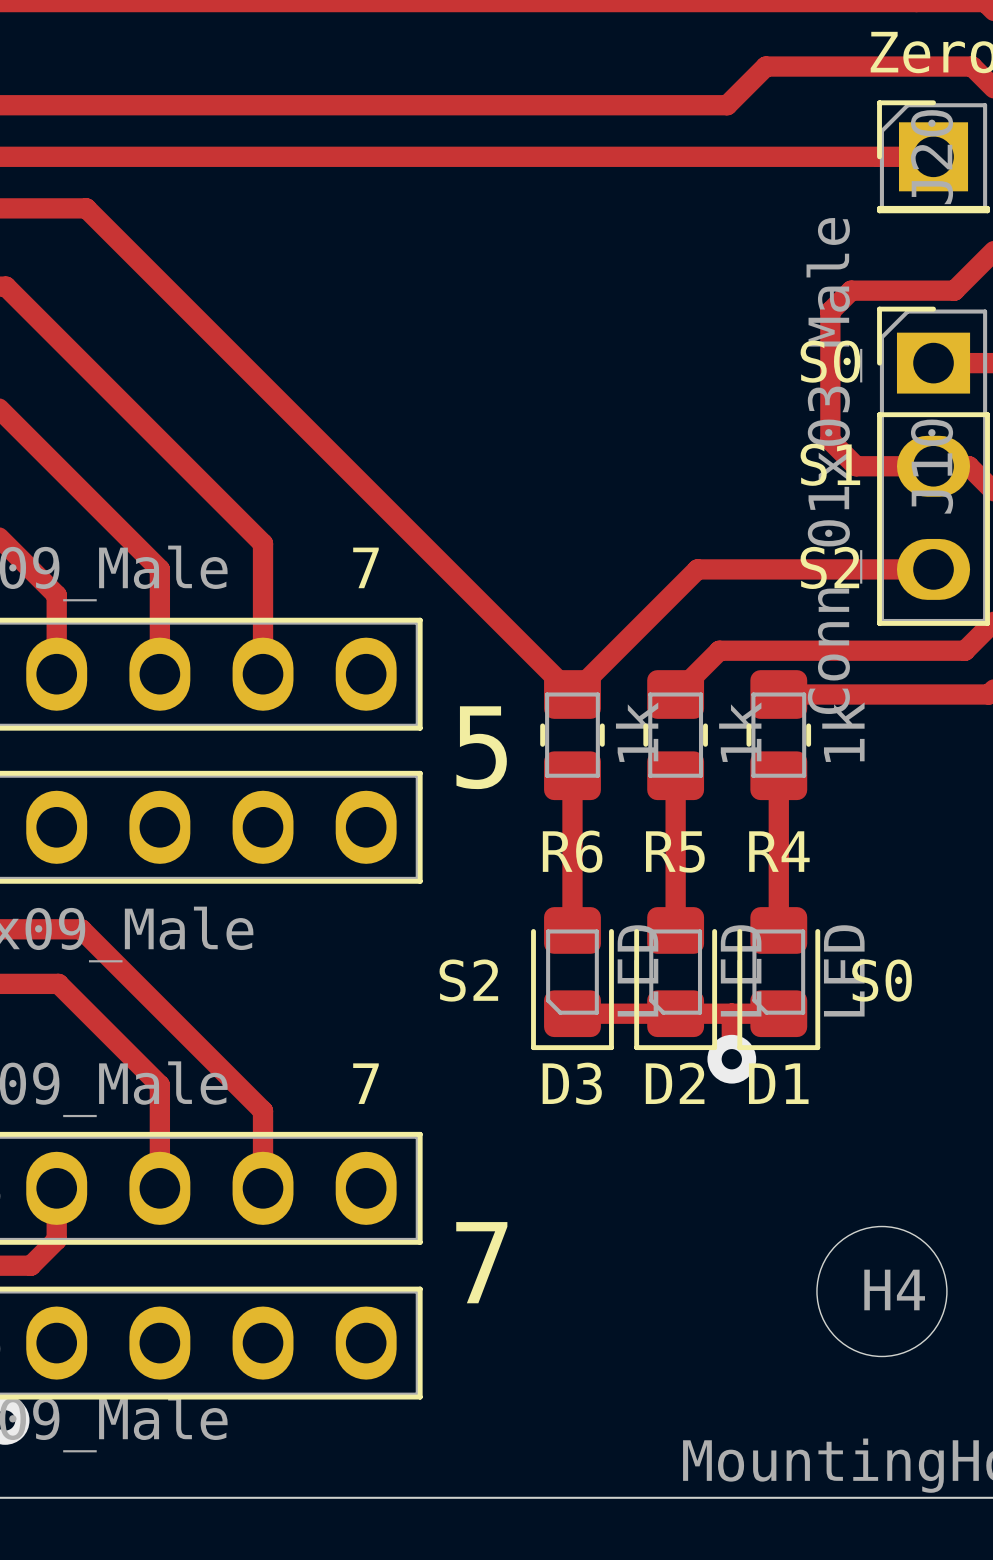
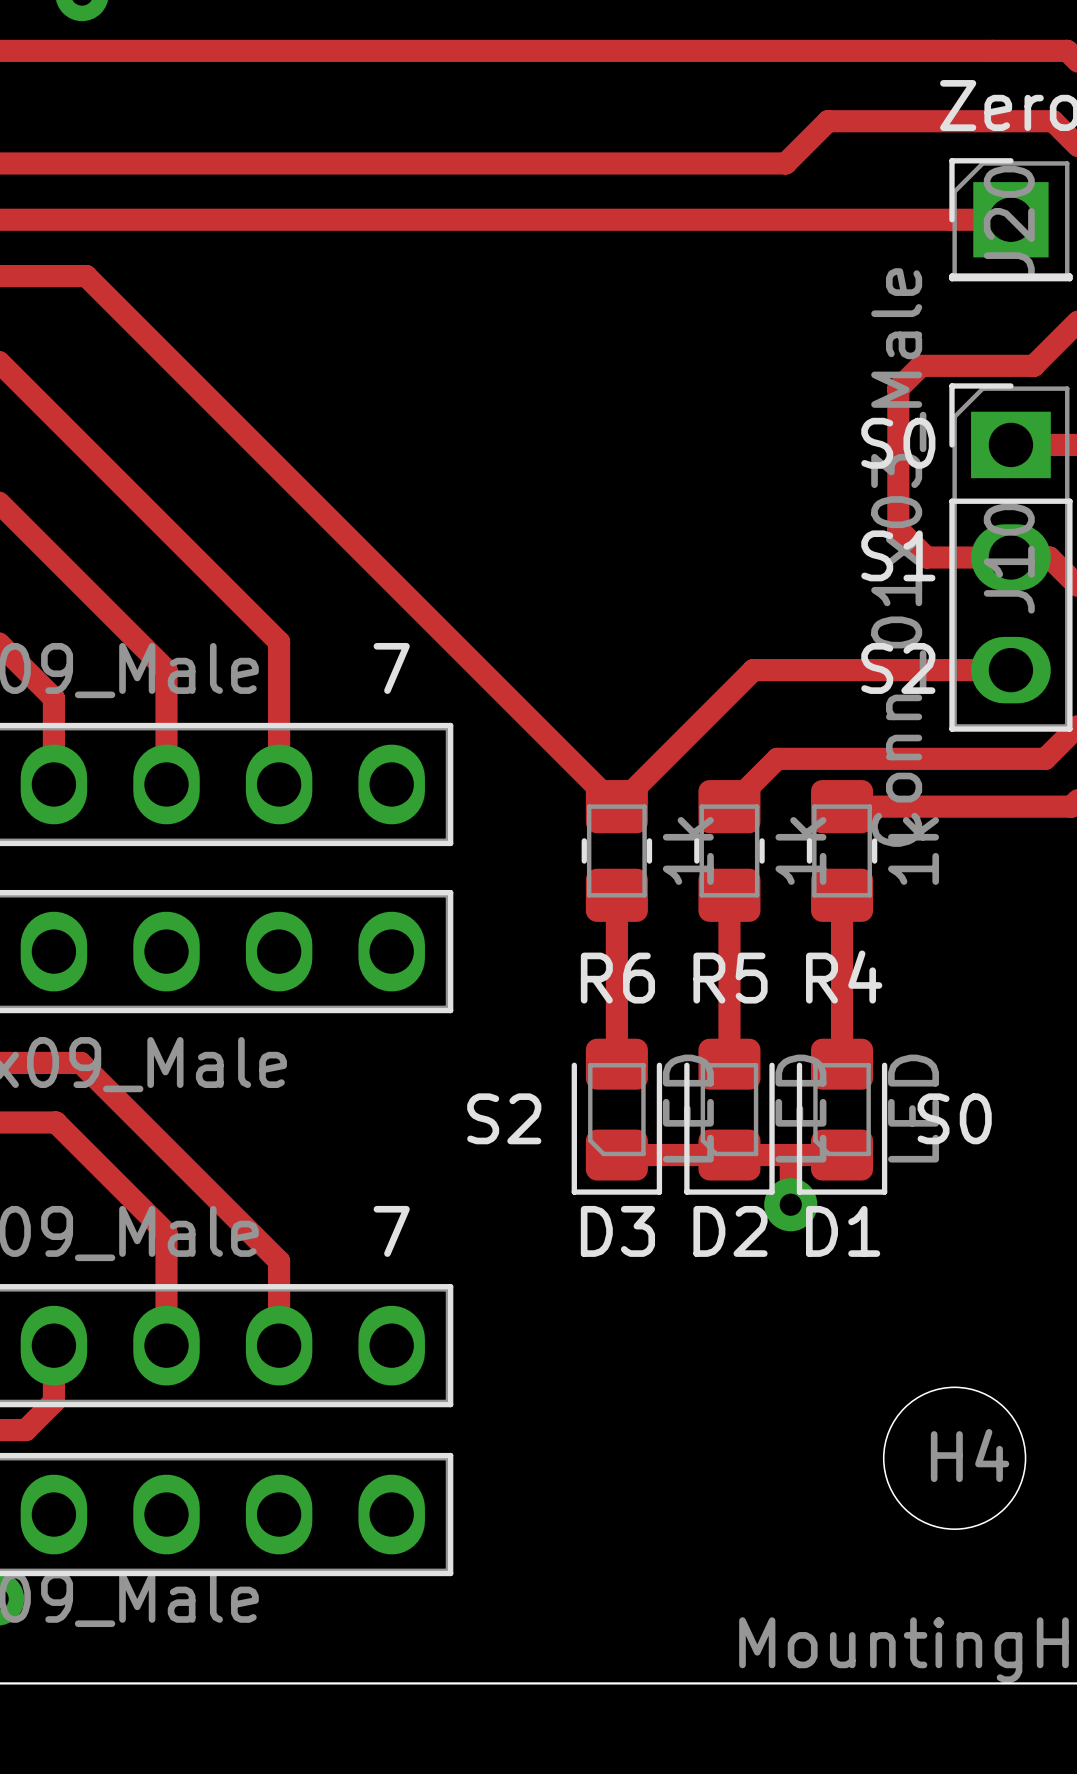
text: 5 (481, 747) -> none
text: 7 (481, 1262) -> none

